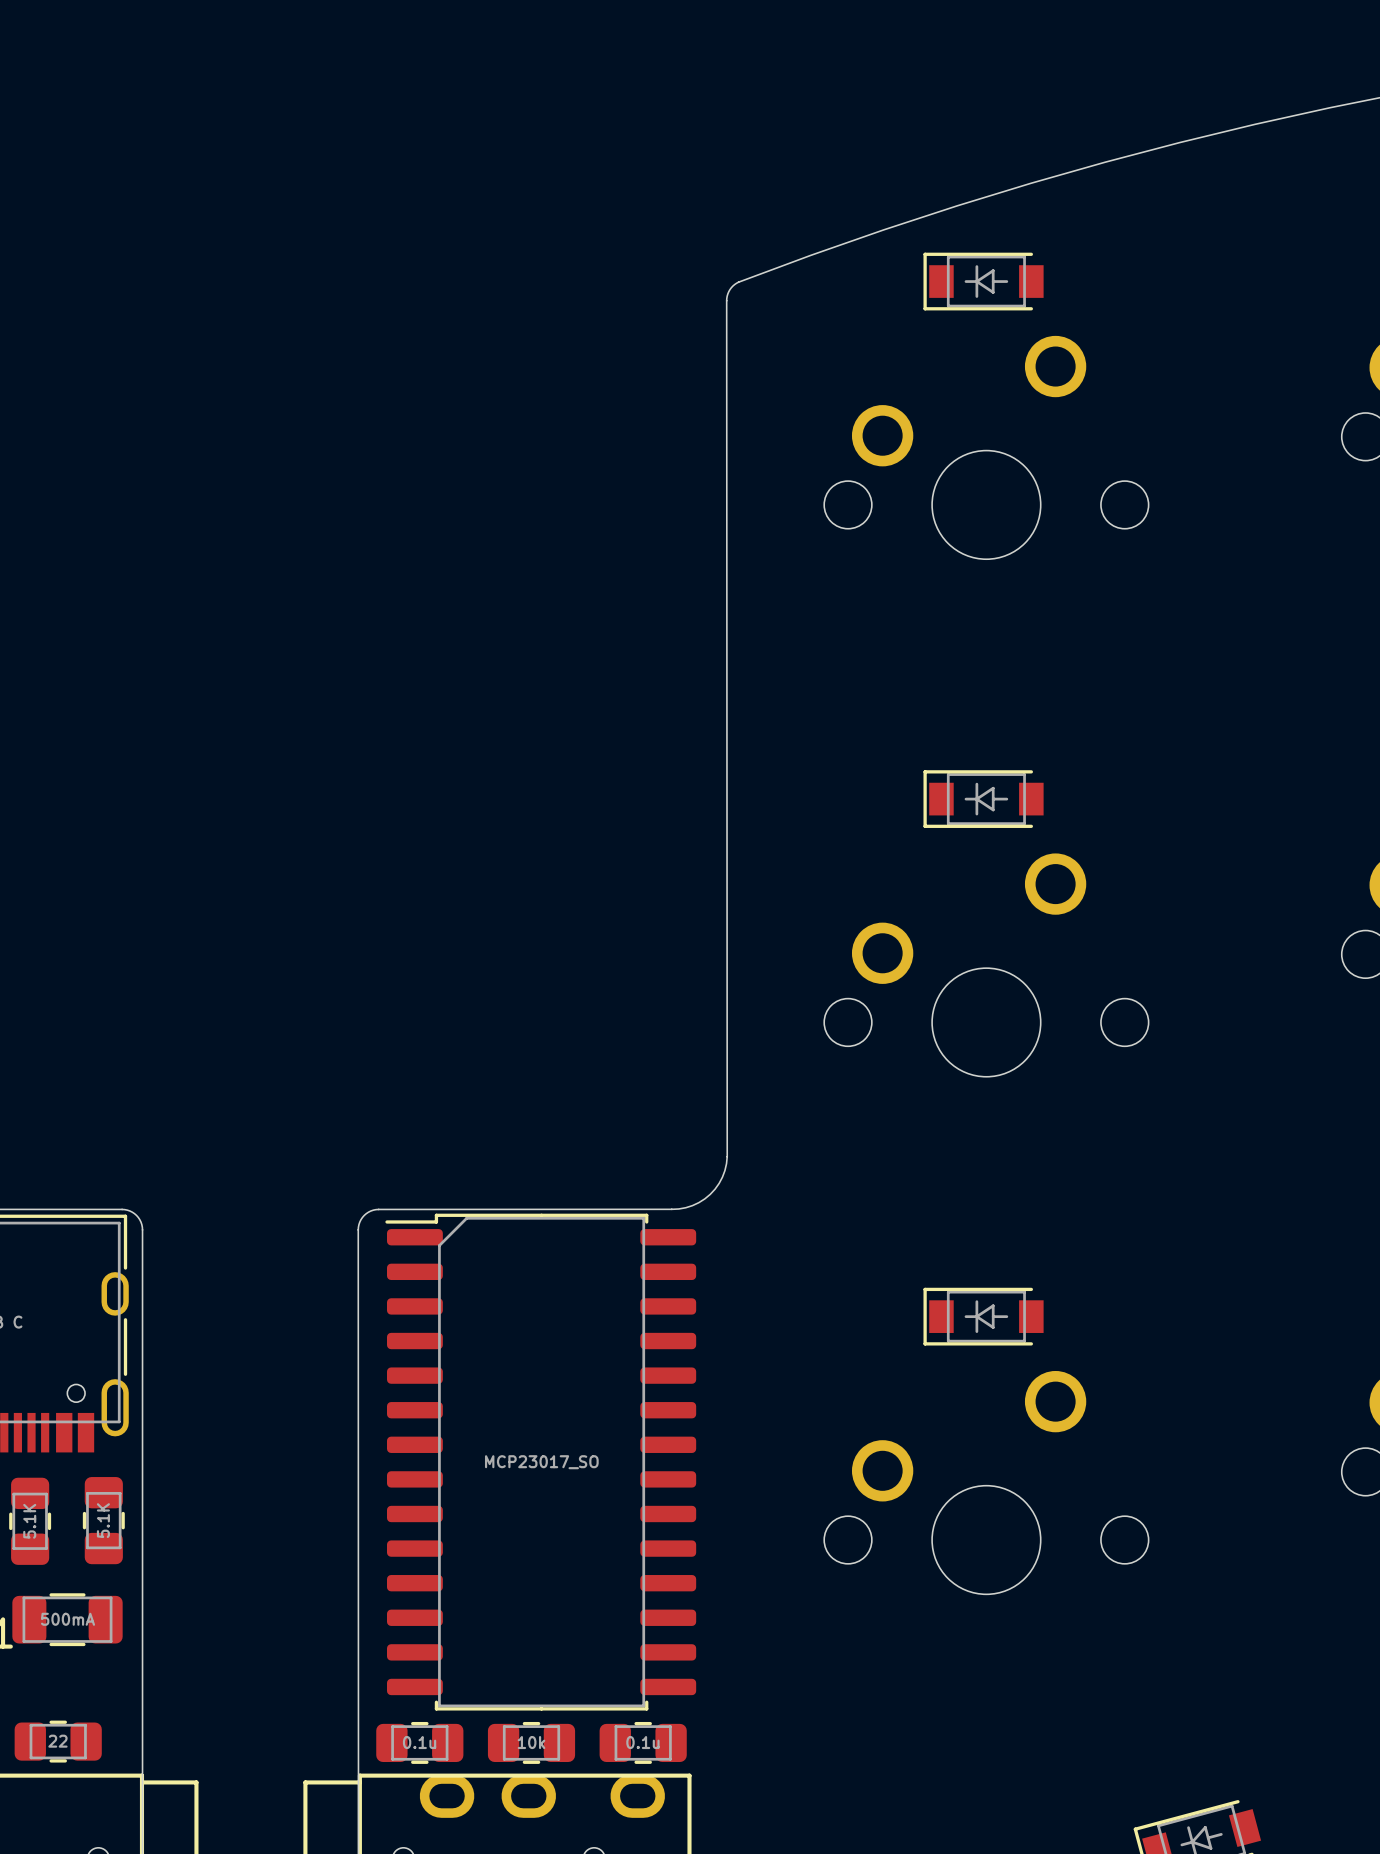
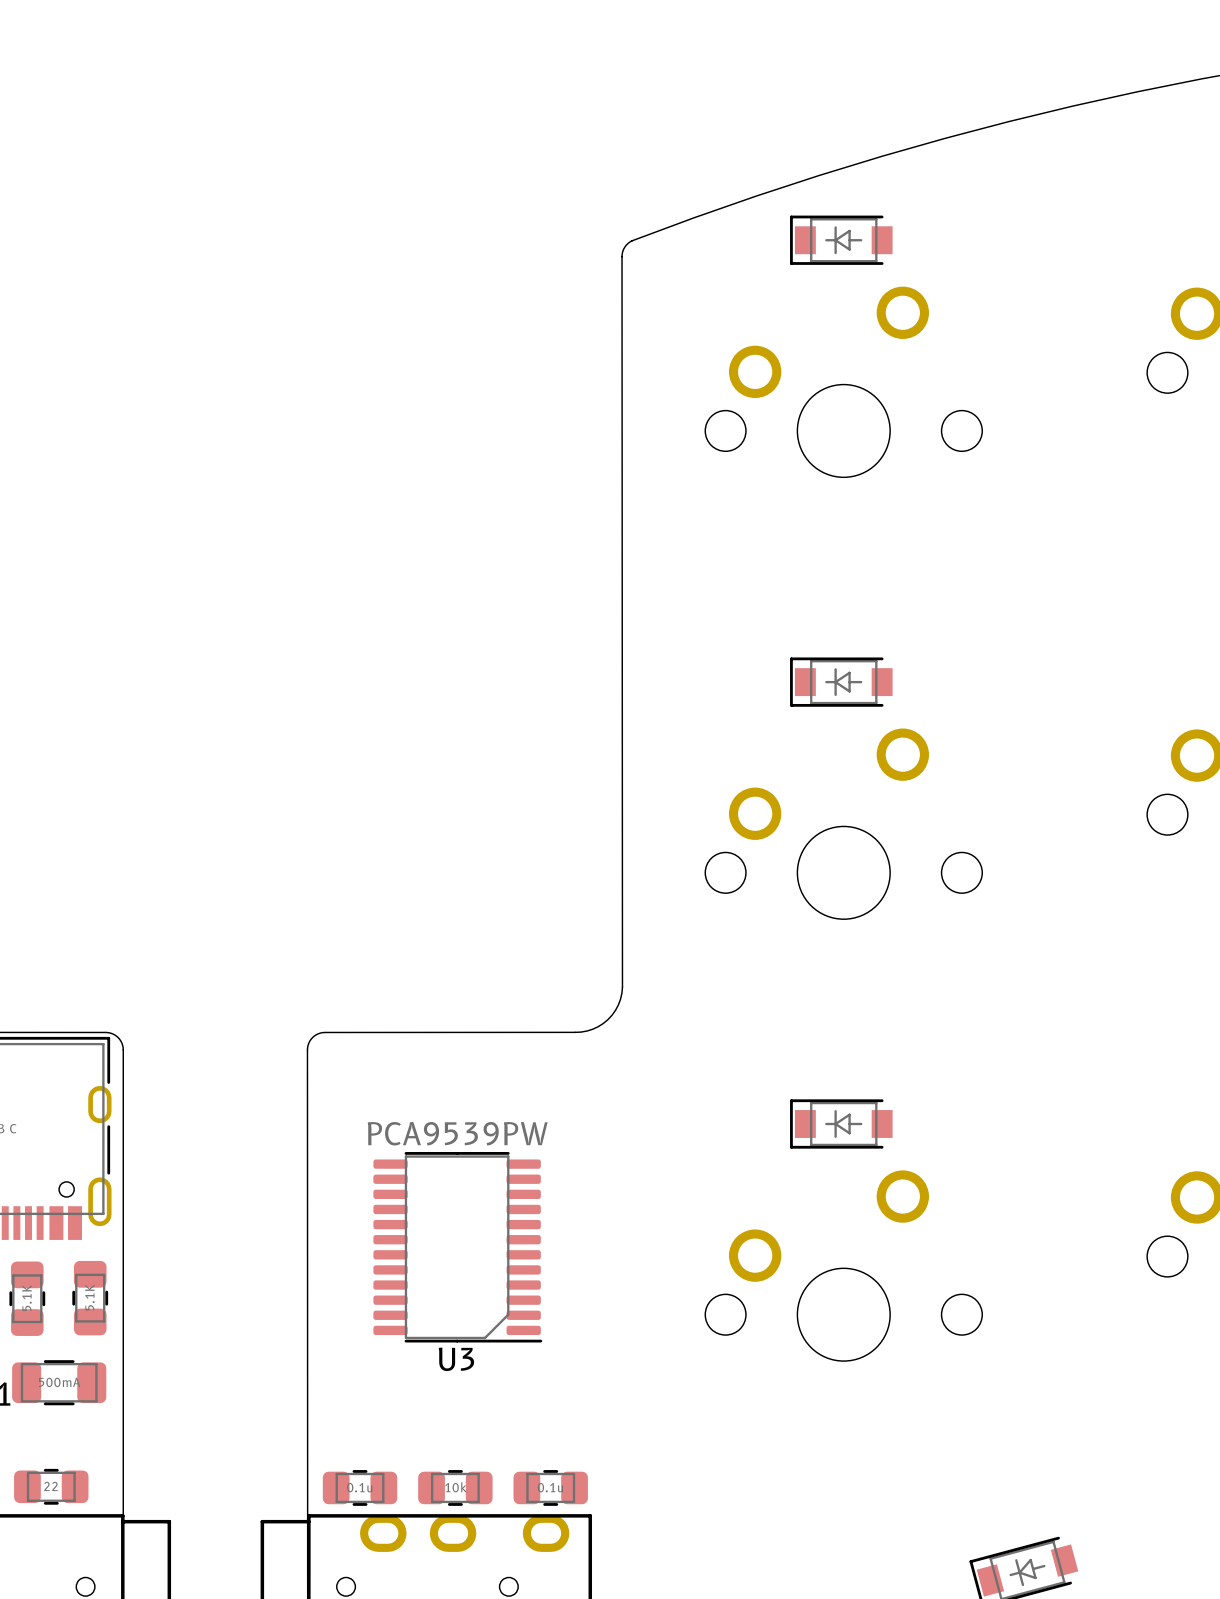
U3: none -> PCA9539PW (457, 1247)
part: MCP23017_SO (540, 1462) -> none

